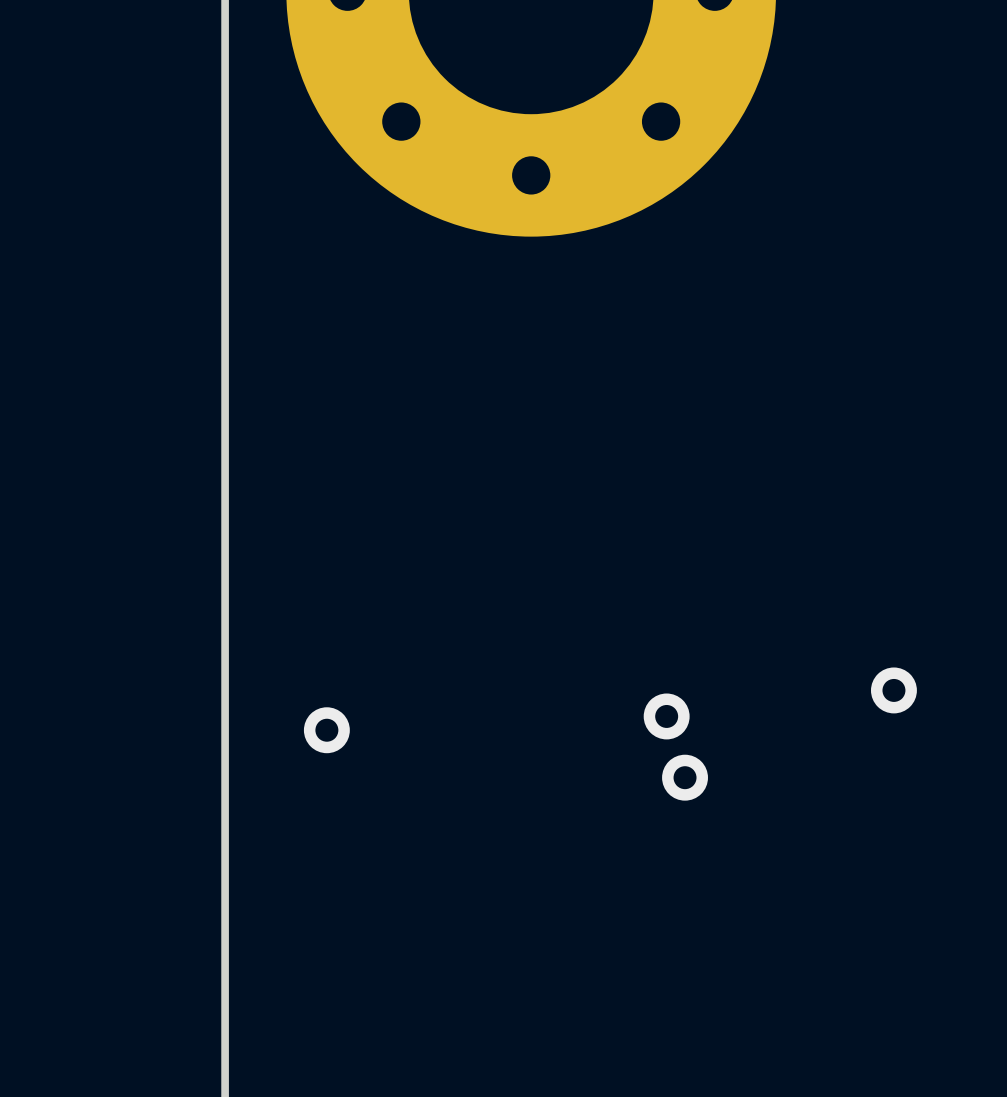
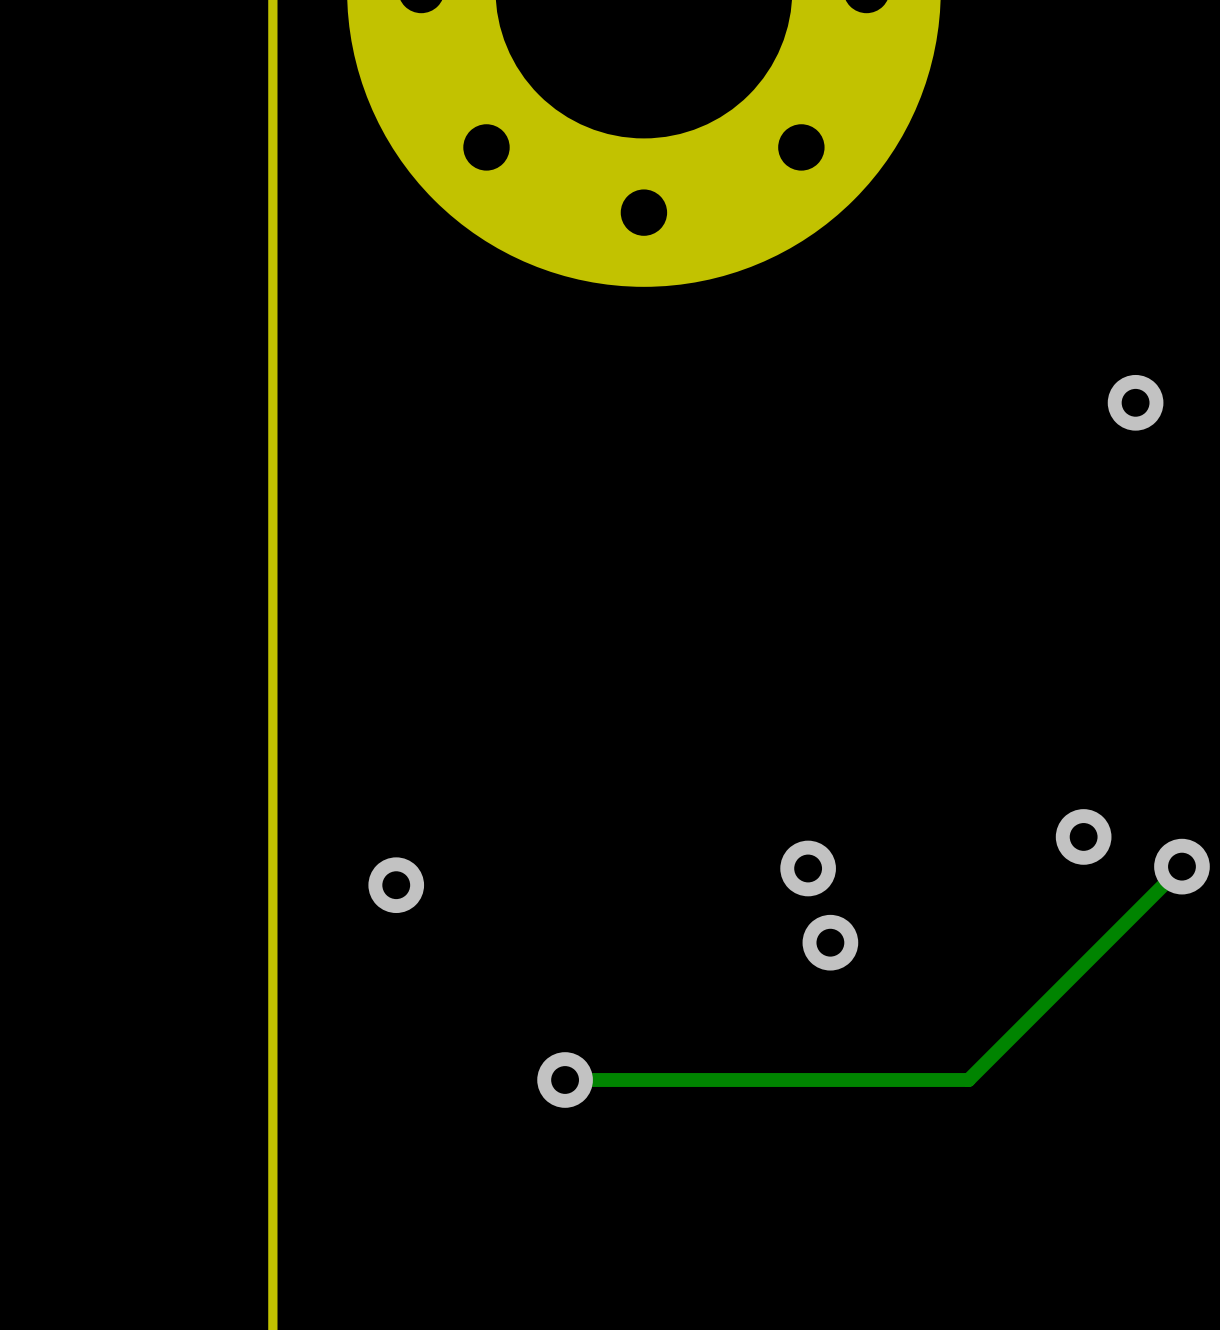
via: none -> (1135, 402)
track: none -> (1181, 866) (968, 1080) (565, 1080)
via: none -> (1181, 866)
via: none -> (565, 1080)

